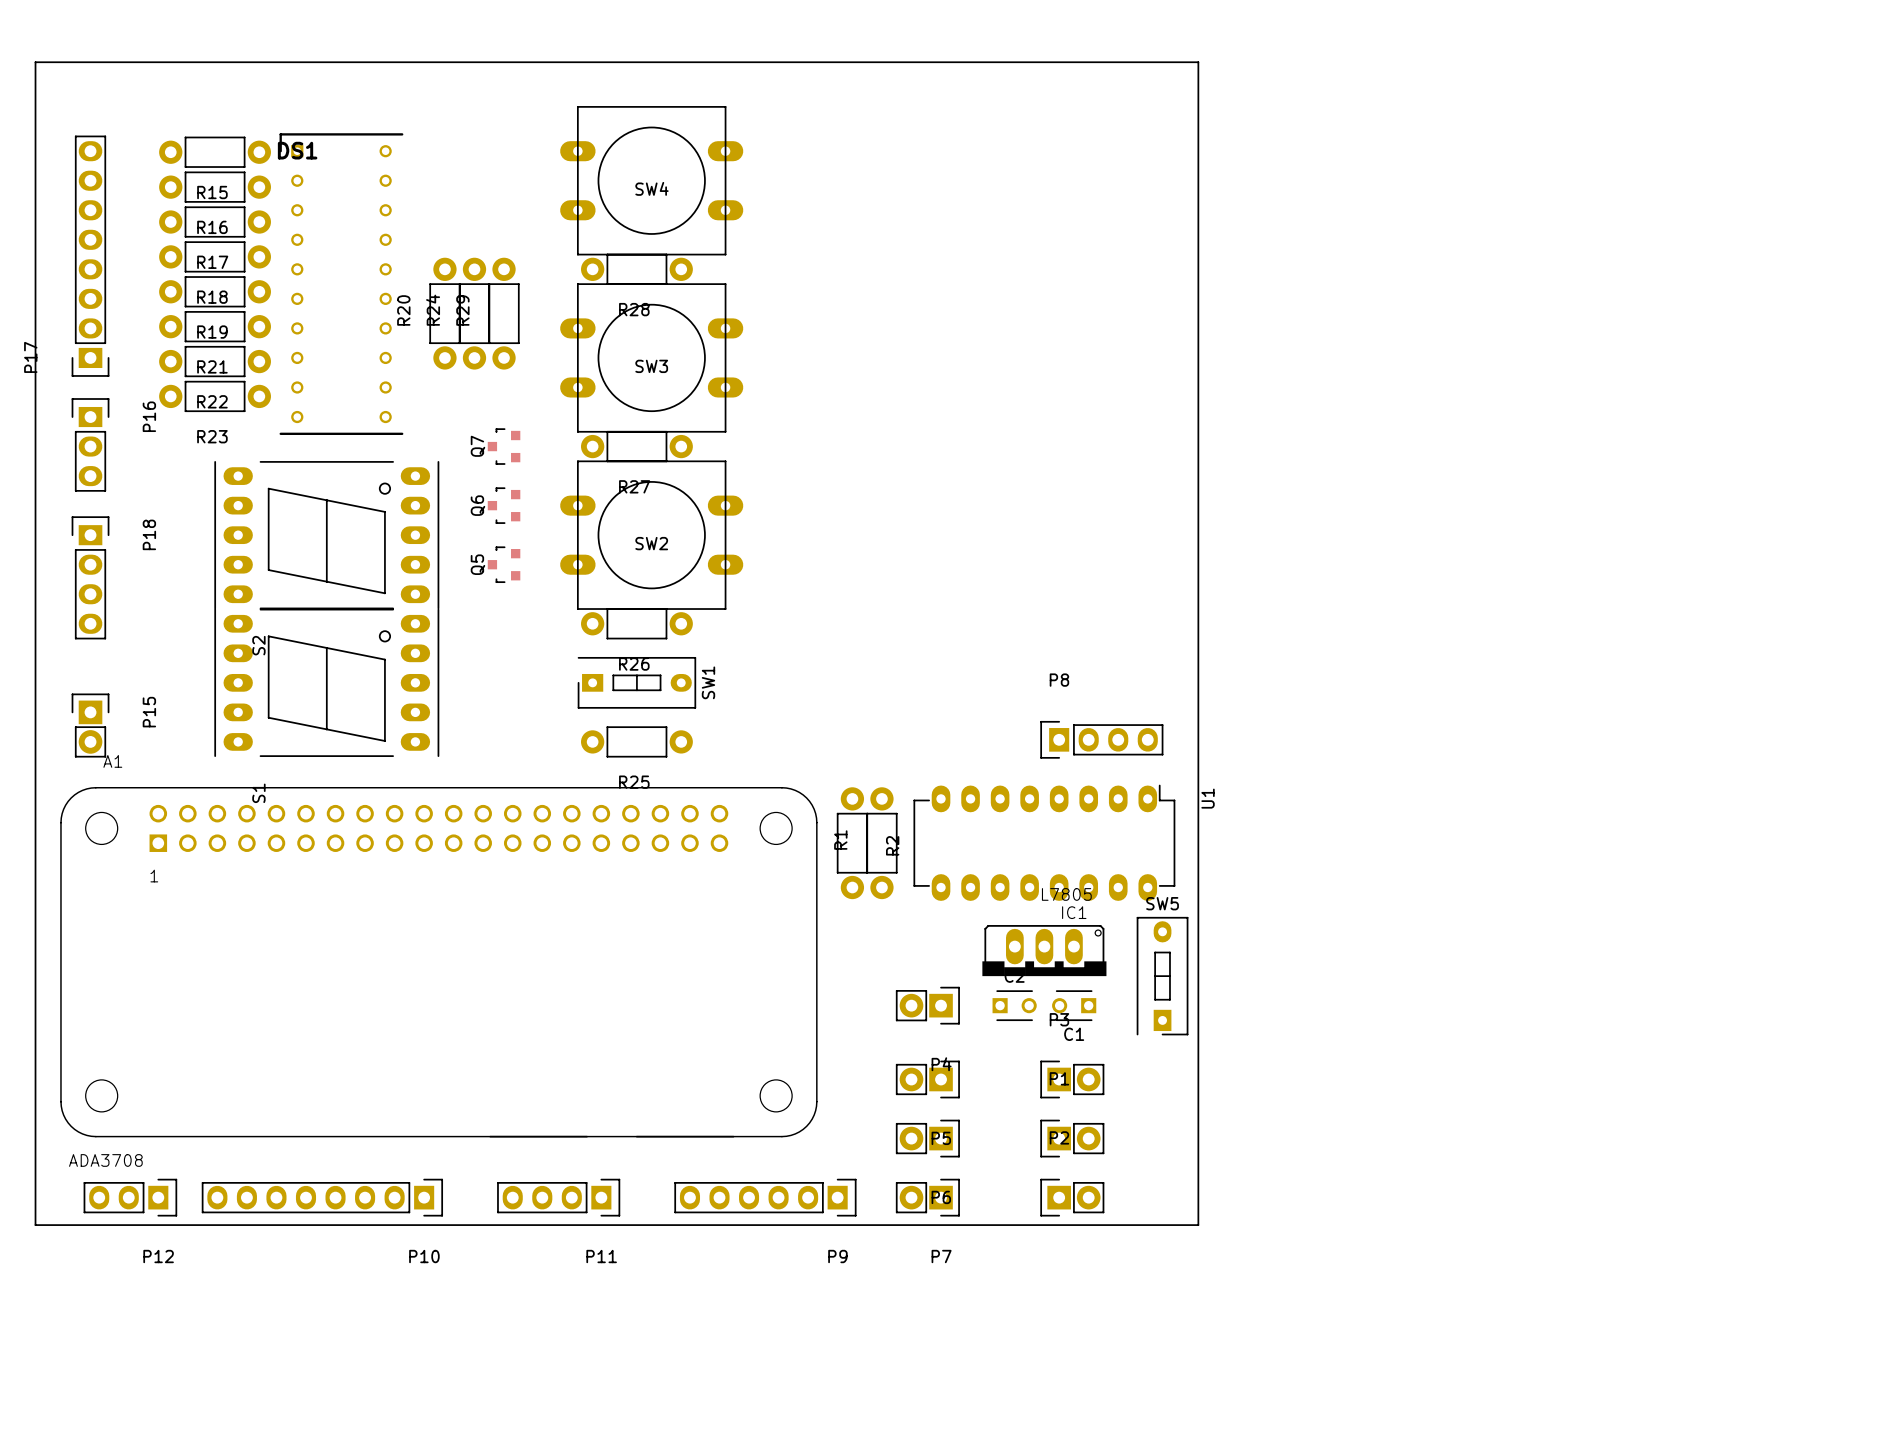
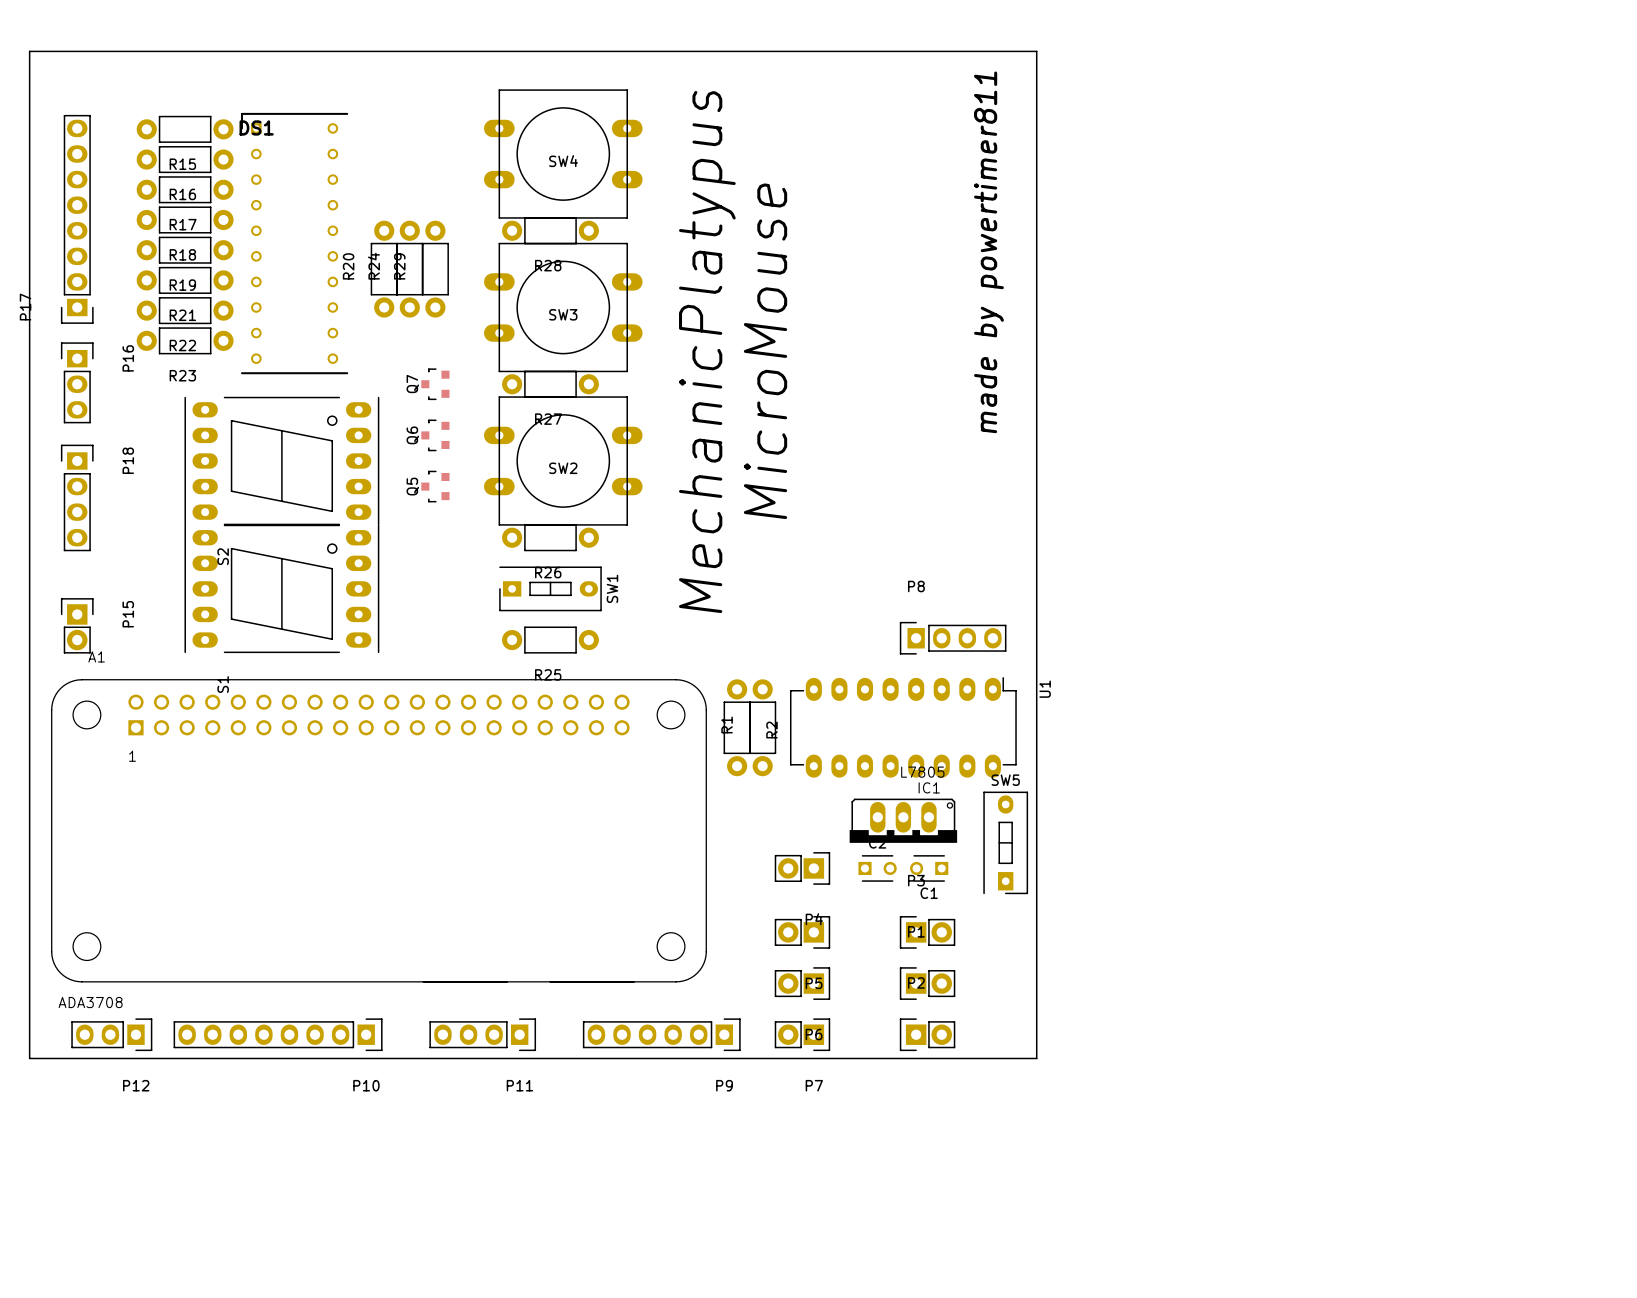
text: none -> made by powertimer811 (988, 252)
text: none -> MicroMouse (765, 351)
text: none -> MechanicPlatypus (707, 351)

